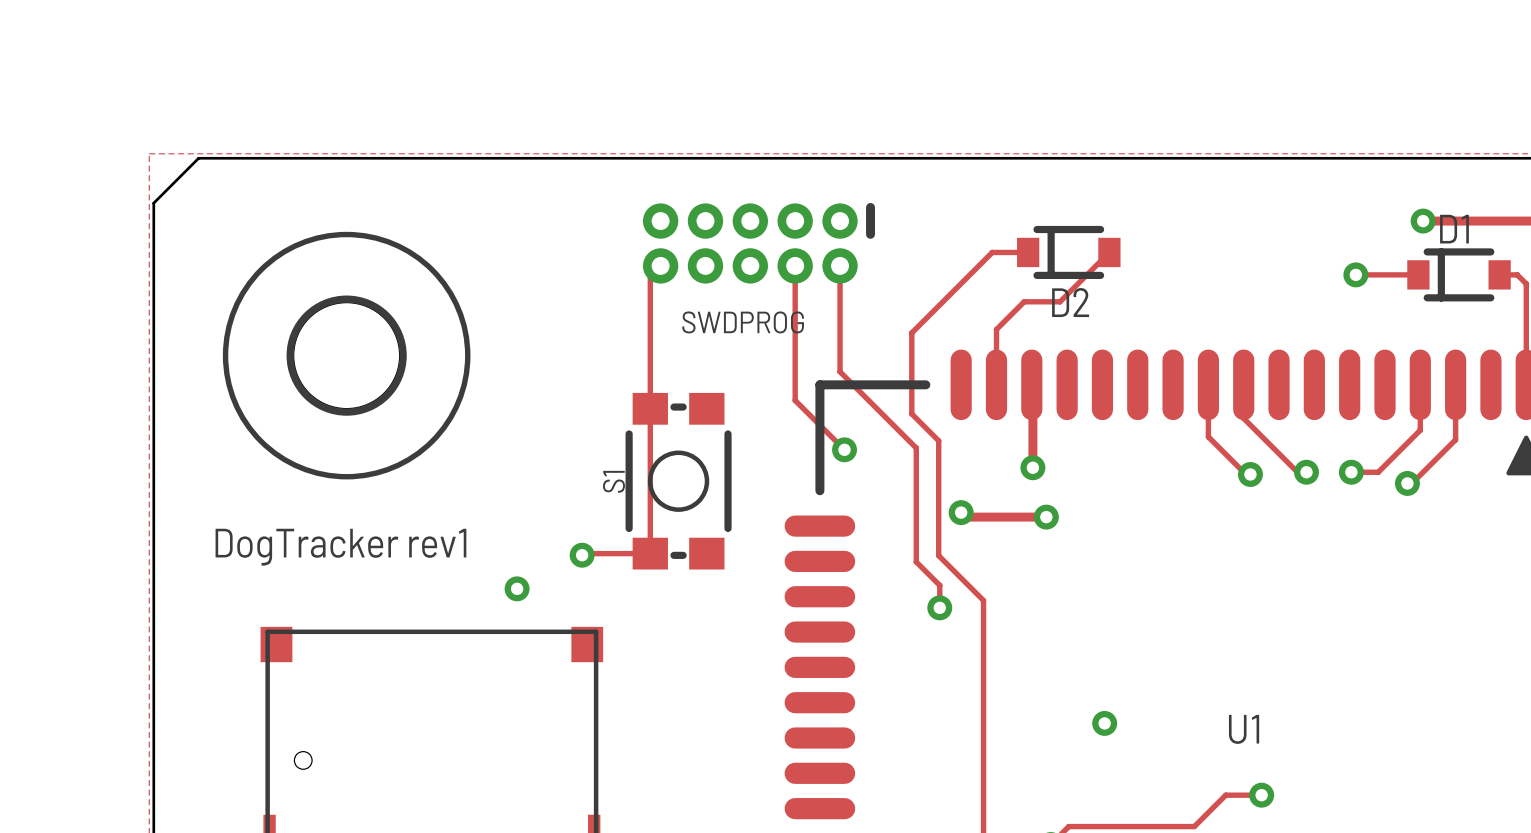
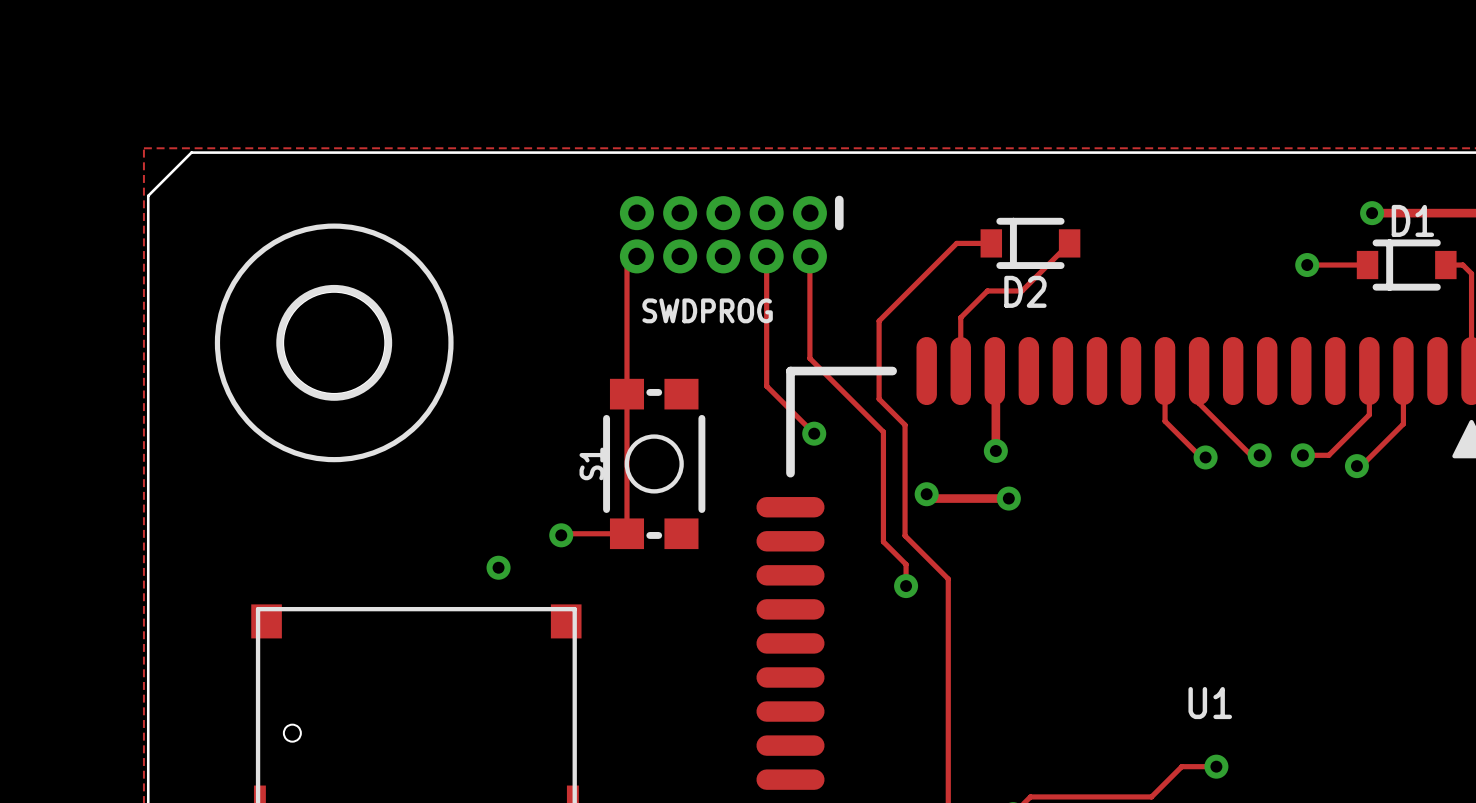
text: DogTracker rev1 (340, 547) -> none
via: (1104, 723) -> none

